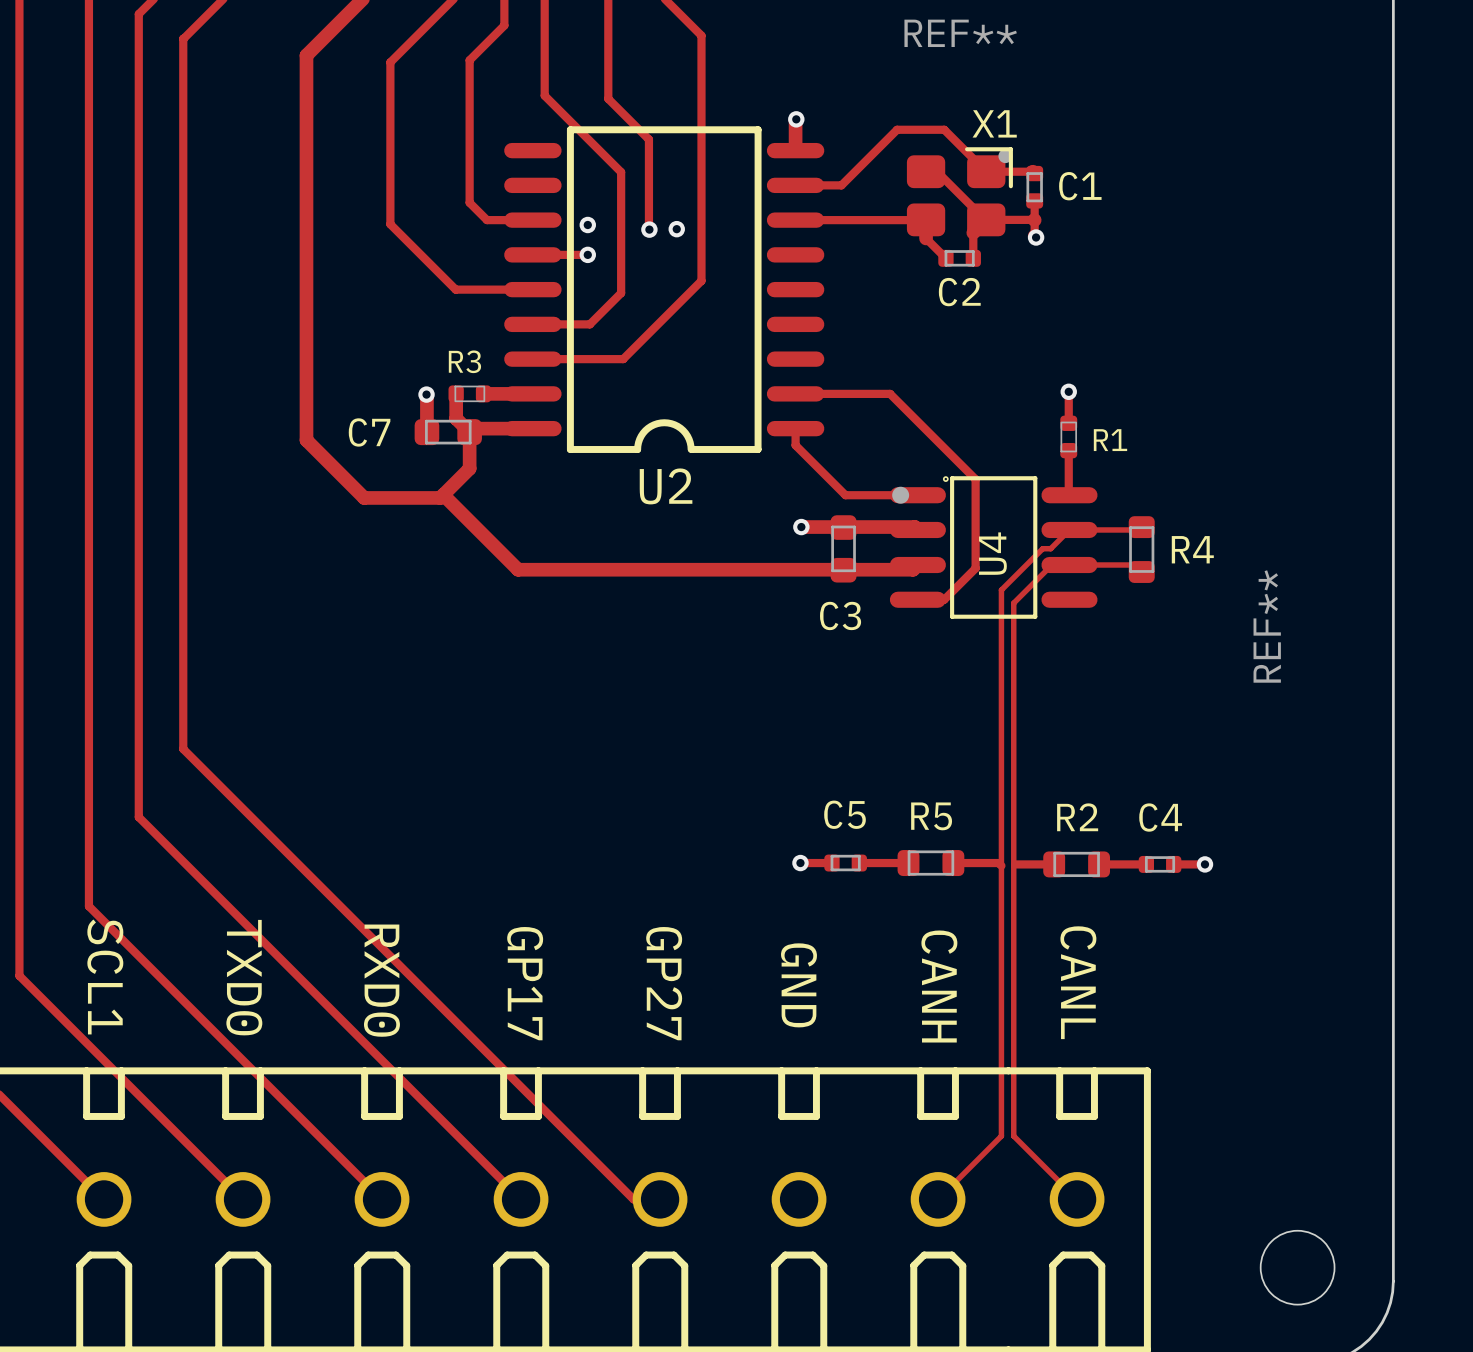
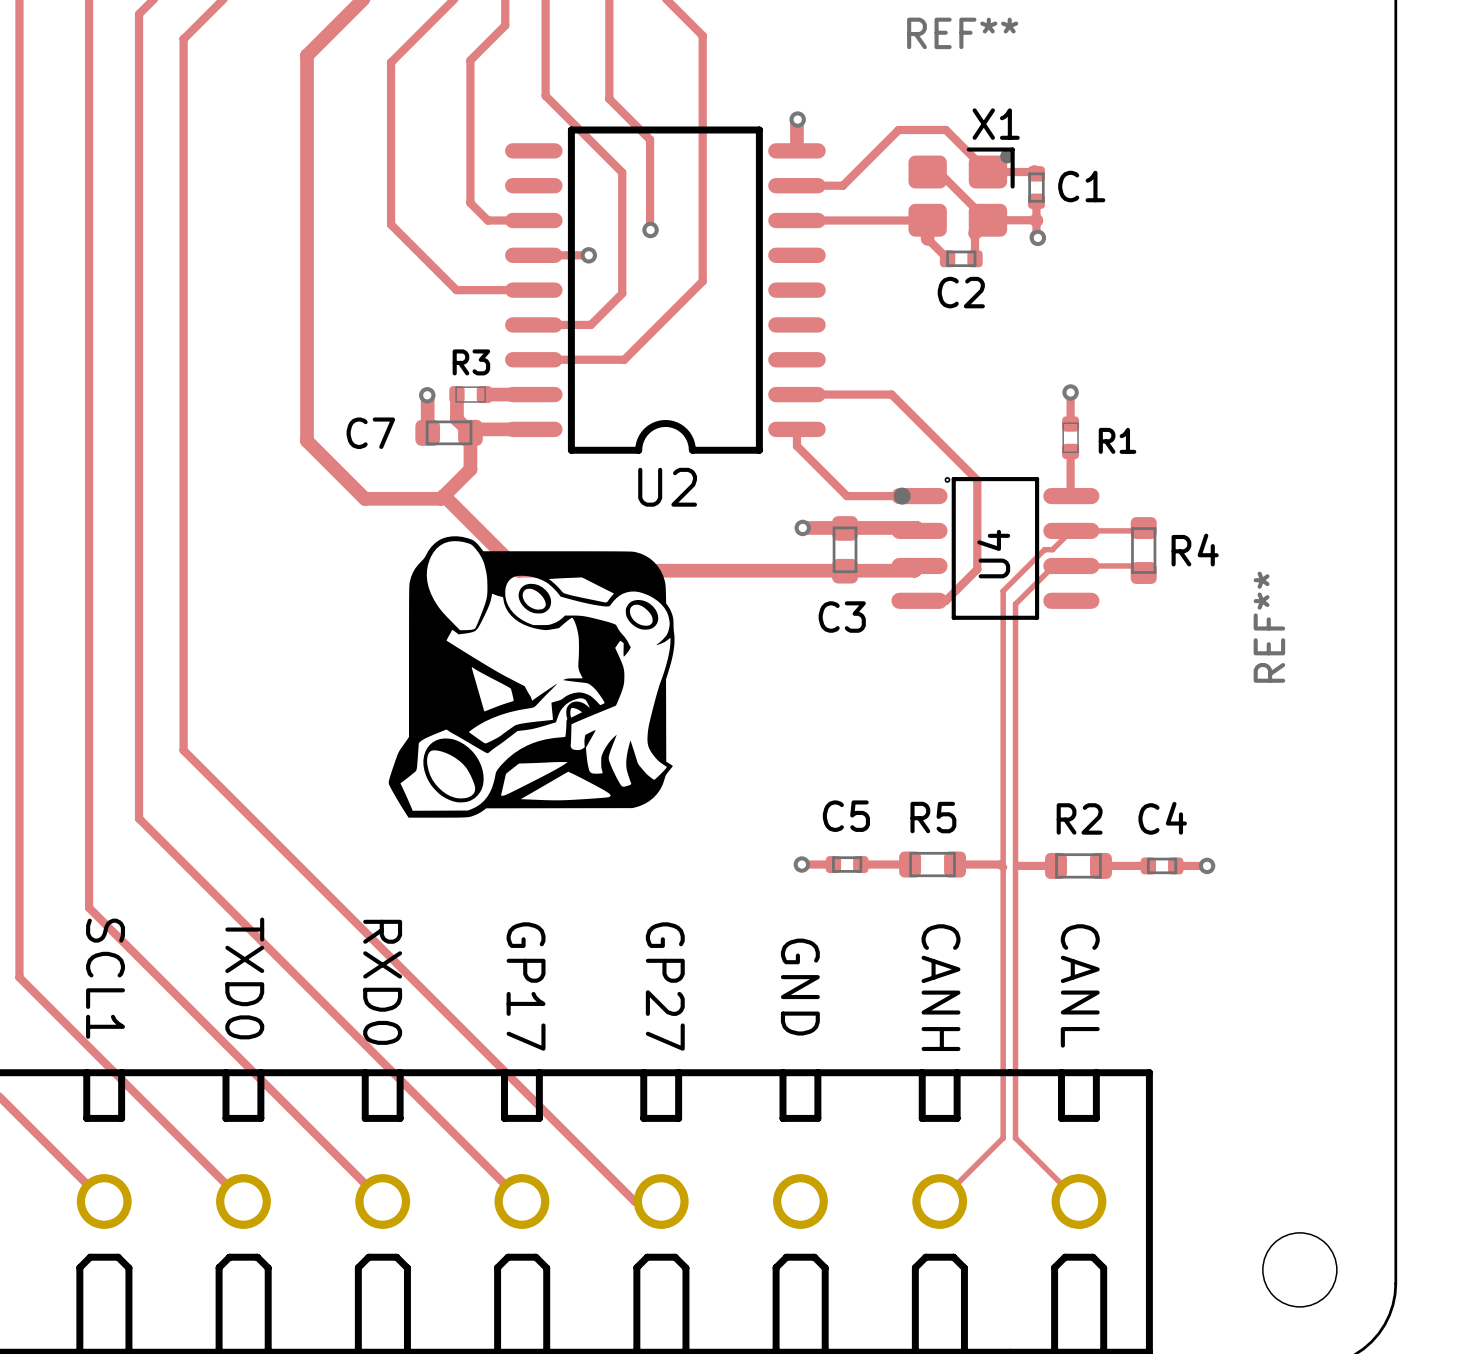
via: (587, 224) -> none
via: (676, 229) -> none
drawing: none -> [388, 536, 675, 818]

